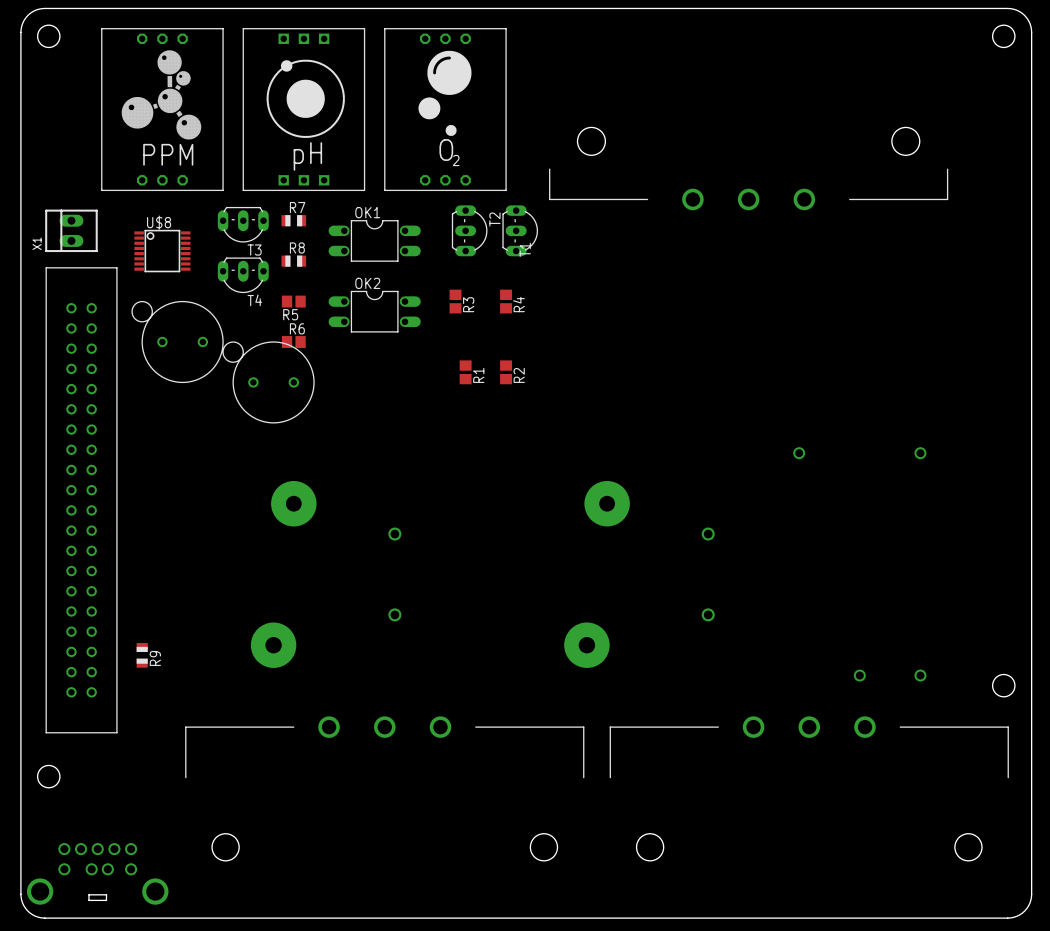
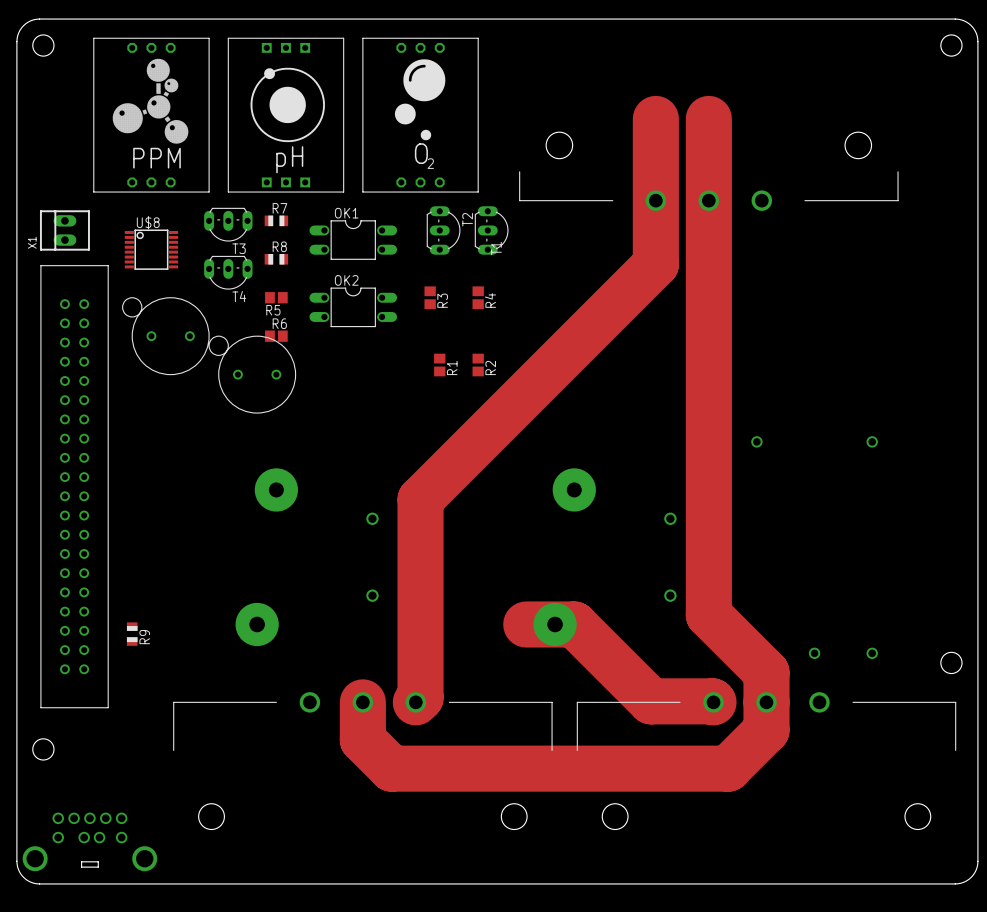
track: none -> (655, 118) (655, 264) (420, 499) (420, 697) (415, 702)
track: none -> (708, 118) (708, 614) (766, 672) (766, 730) (728, 768) (391, 768) (362, 739) (362, 702)
track: none -> (526, 624) (574, 624) (651, 701) (713, 702)

